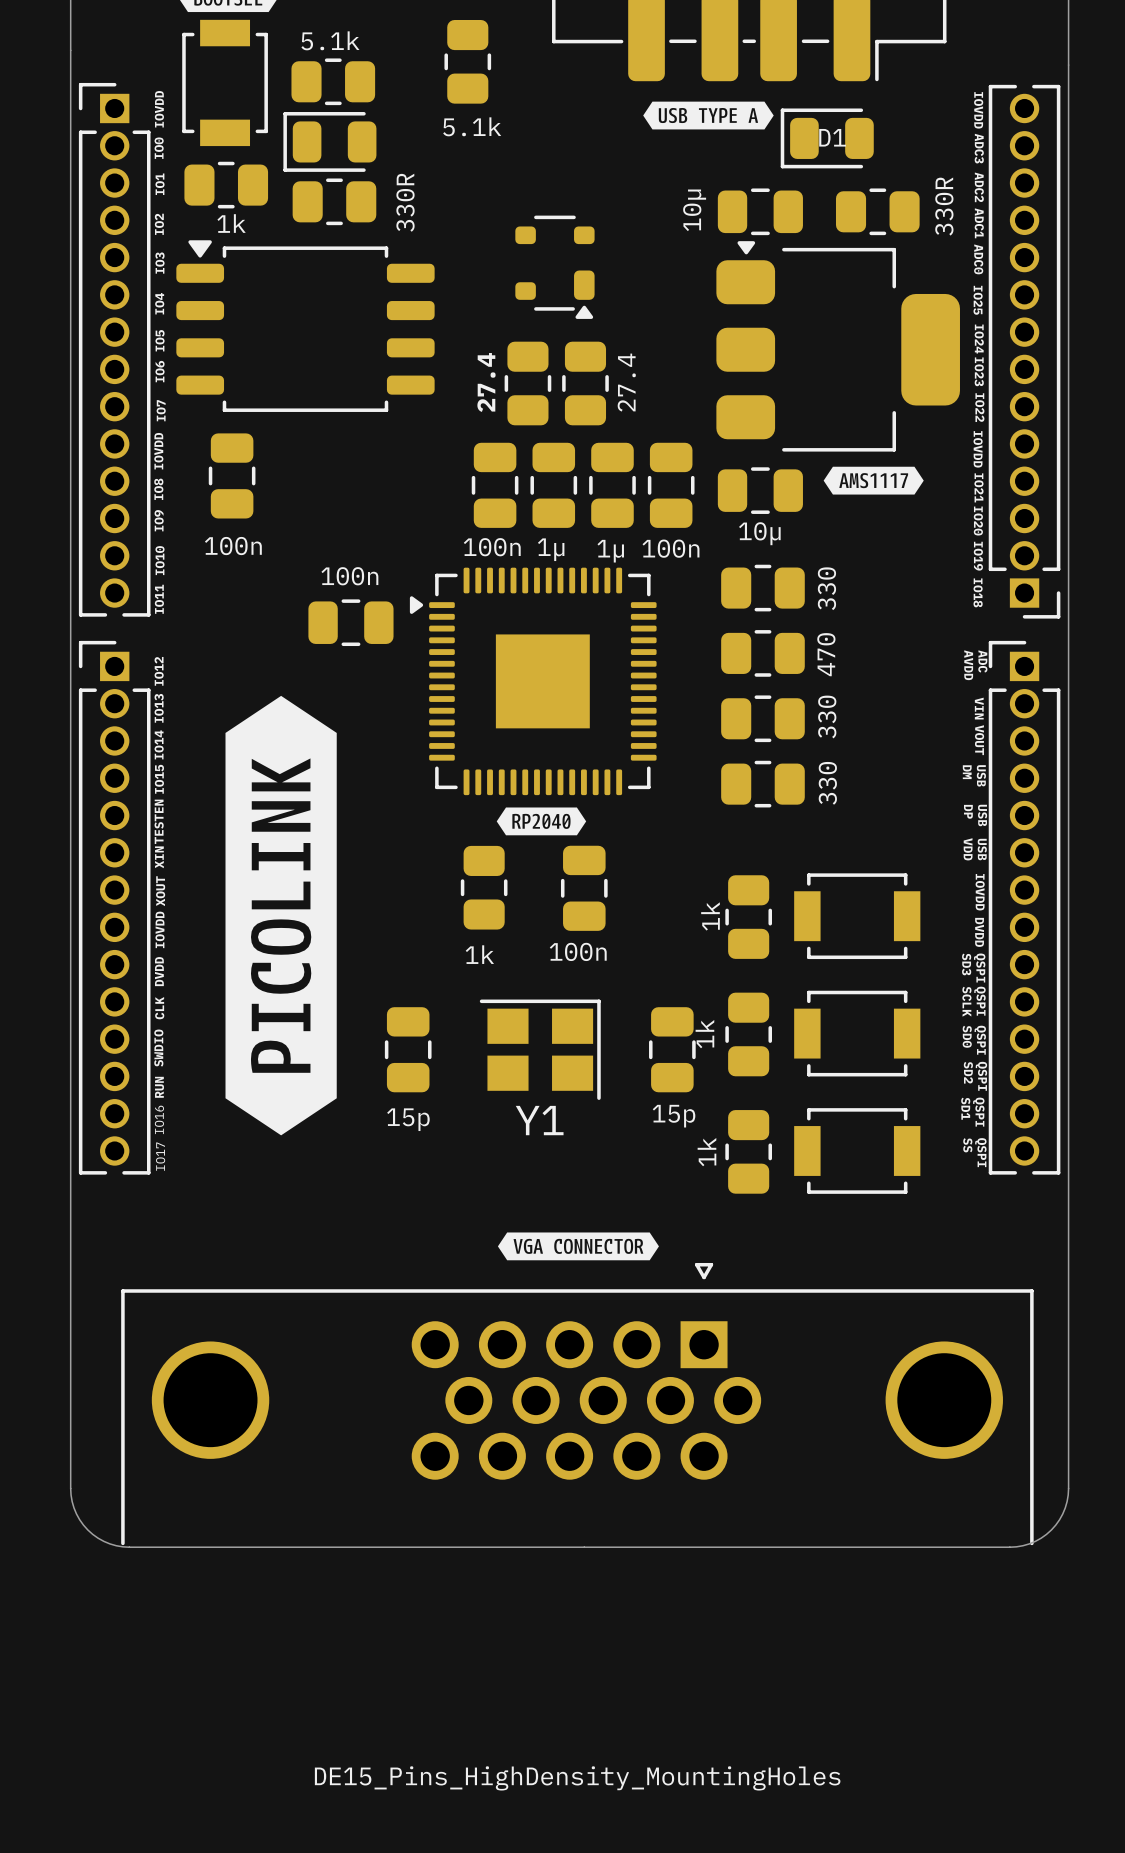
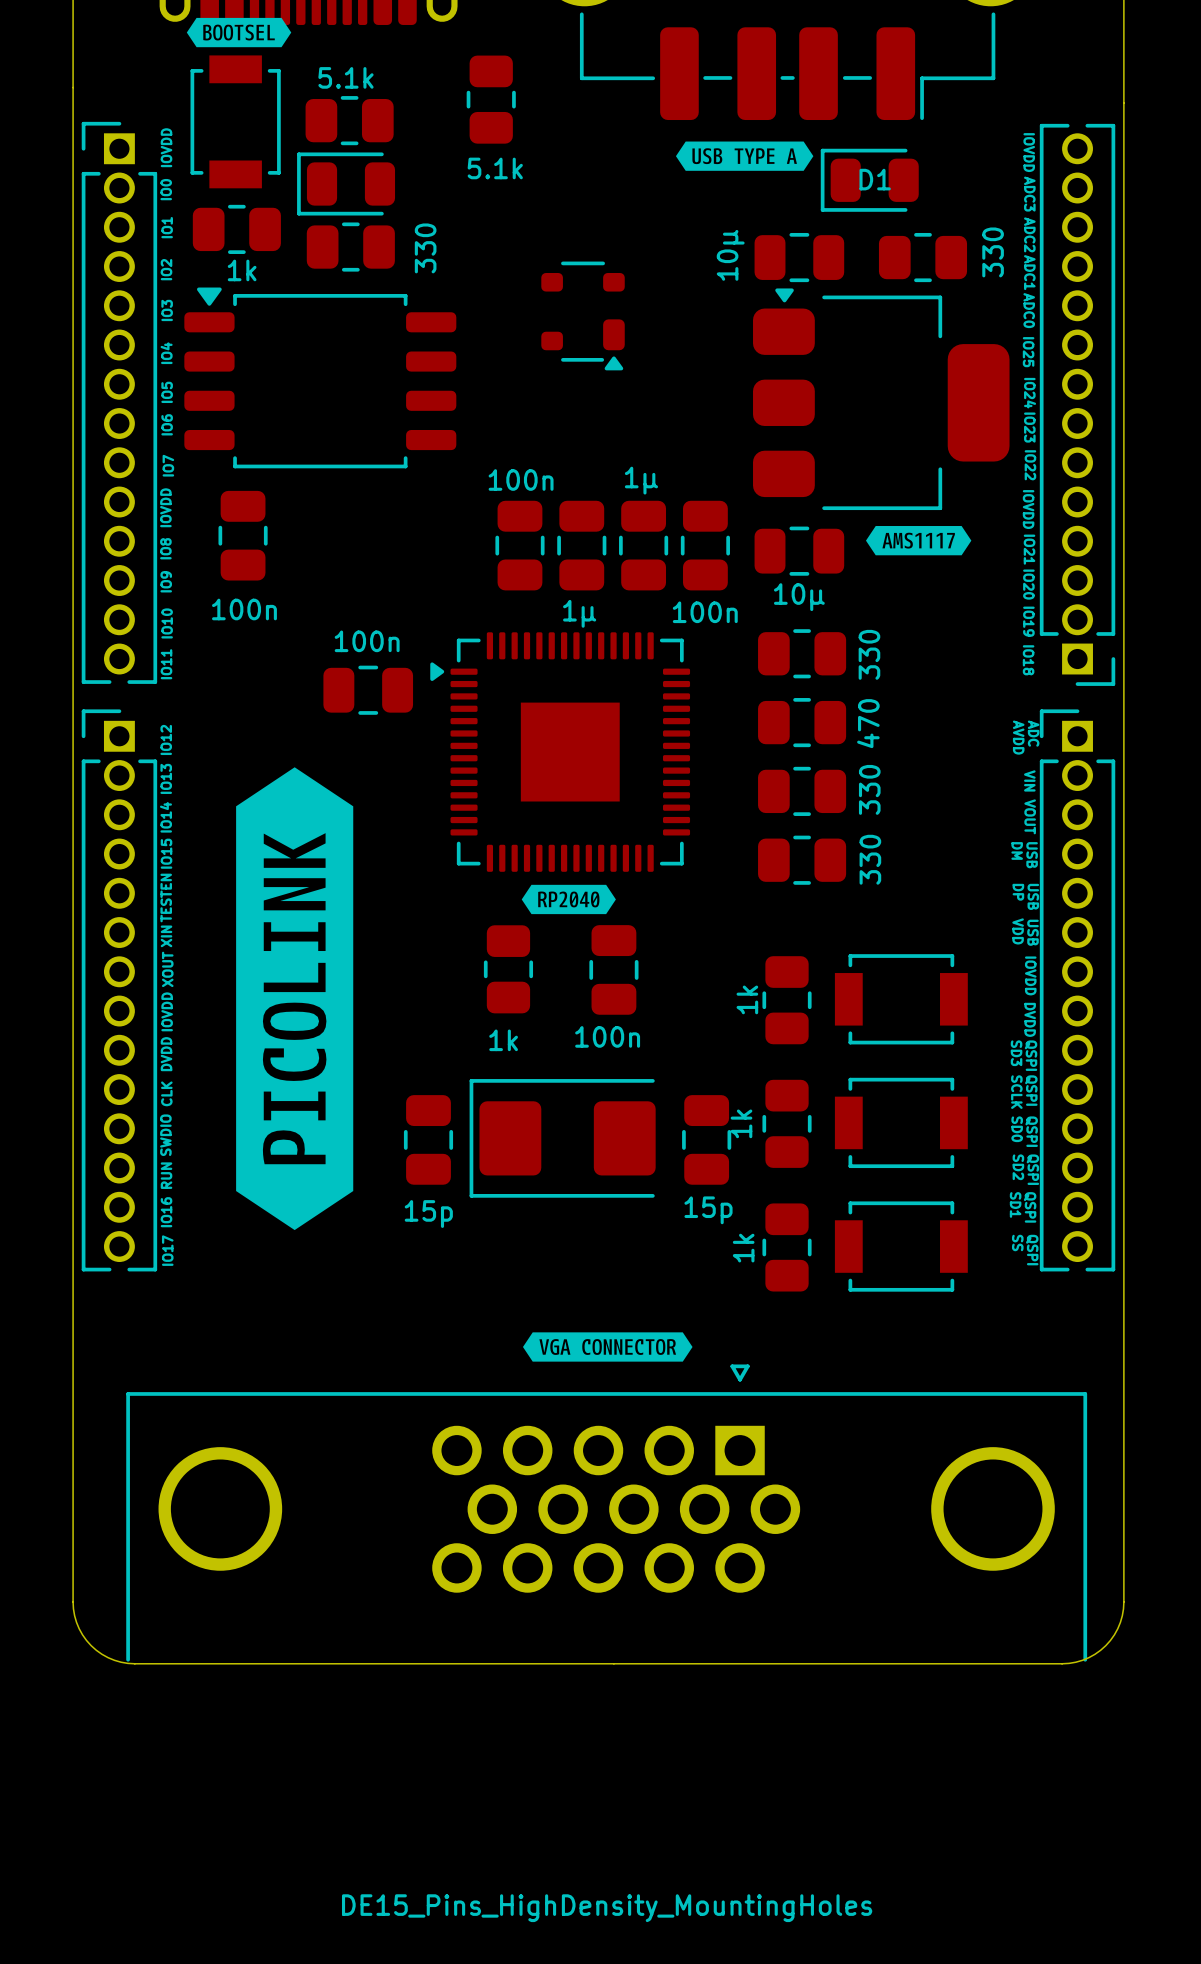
part value: 330R (405, 202) -> 330 (425, 248)
part value: 330R (944, 206) -> 330 (993, 252)
part: 27.4 (527, 383) -> none
part: 27.4 (585, 383) -> none
part value position: 100n (492, 547) -> 100n (521, 479)
part value position: 1µ (610, 551) -> 1µ (641, 480)
part: none -> (562, 1138)
Y1: (540, 1049) -> none

